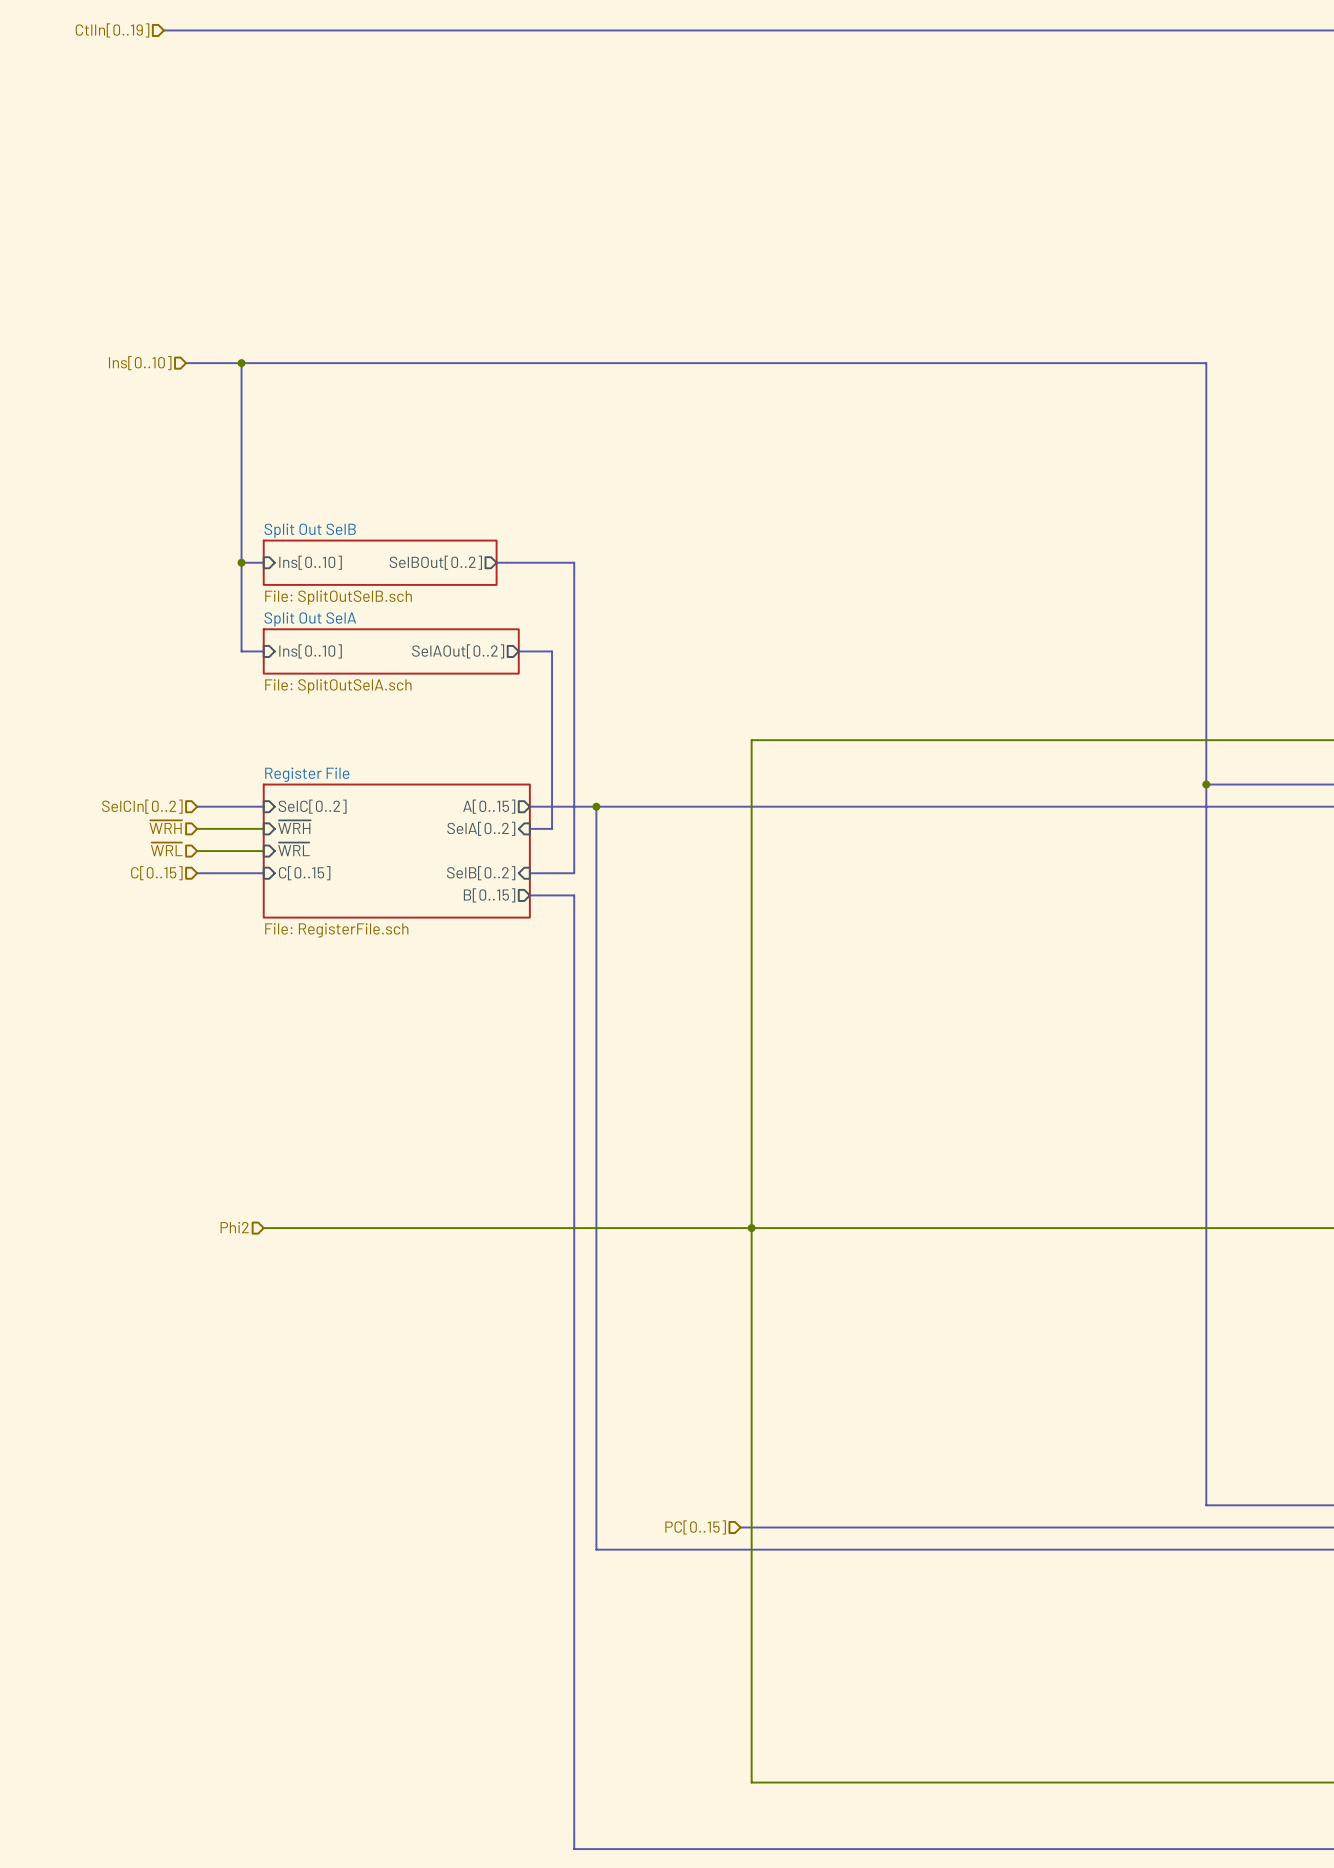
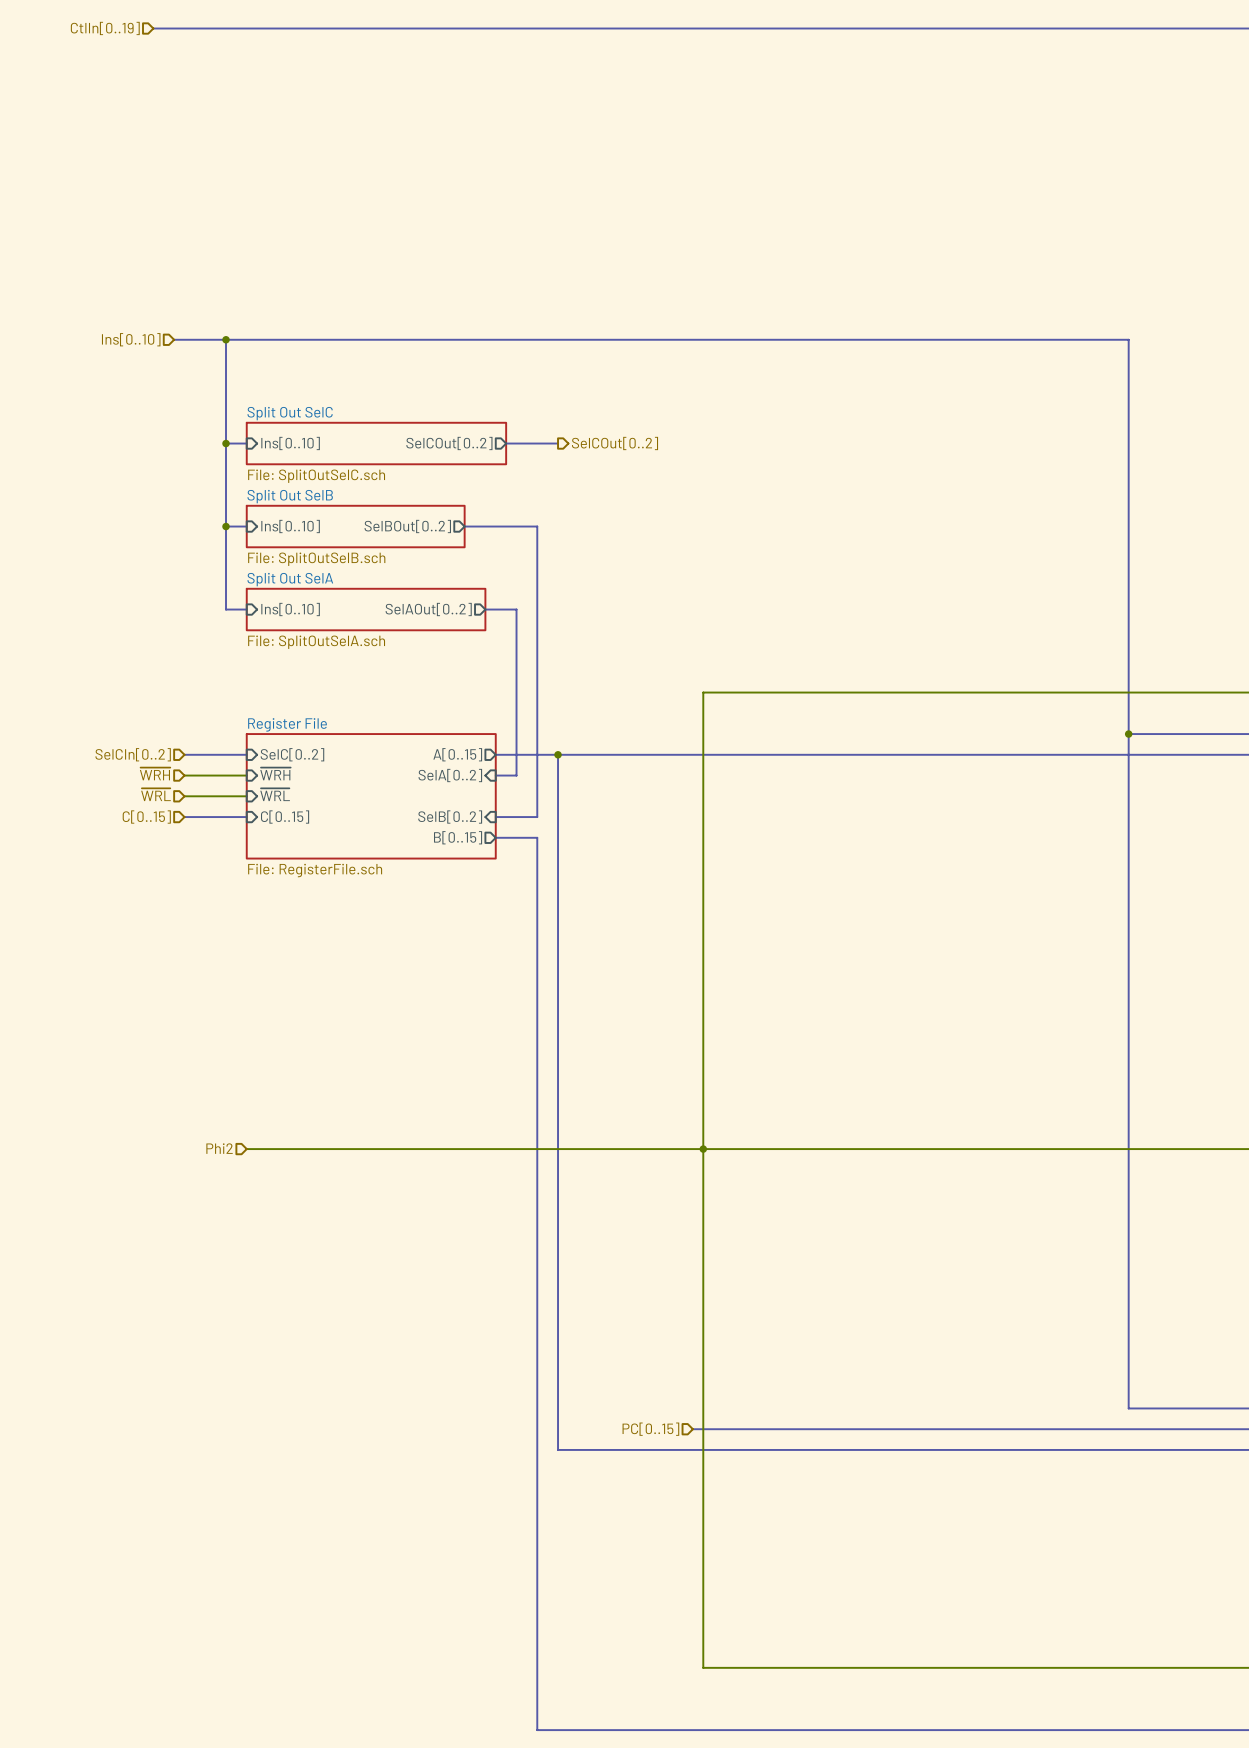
sheet pin: none -> Ins[0..10] (290, 443)
sheet pin: none -> SelCOut[0..2] (449, 443)
hierarchical label: none -> SelCOut[0..2] (615, 443)
bus: none -> (226, 443) (246, 443)
junction: none -> (226, 443)
sheet Split Out SelC: none -> File: SplitOutSelC.sch (376, 443)
bus: none -> (506, 443) (558, 443)

